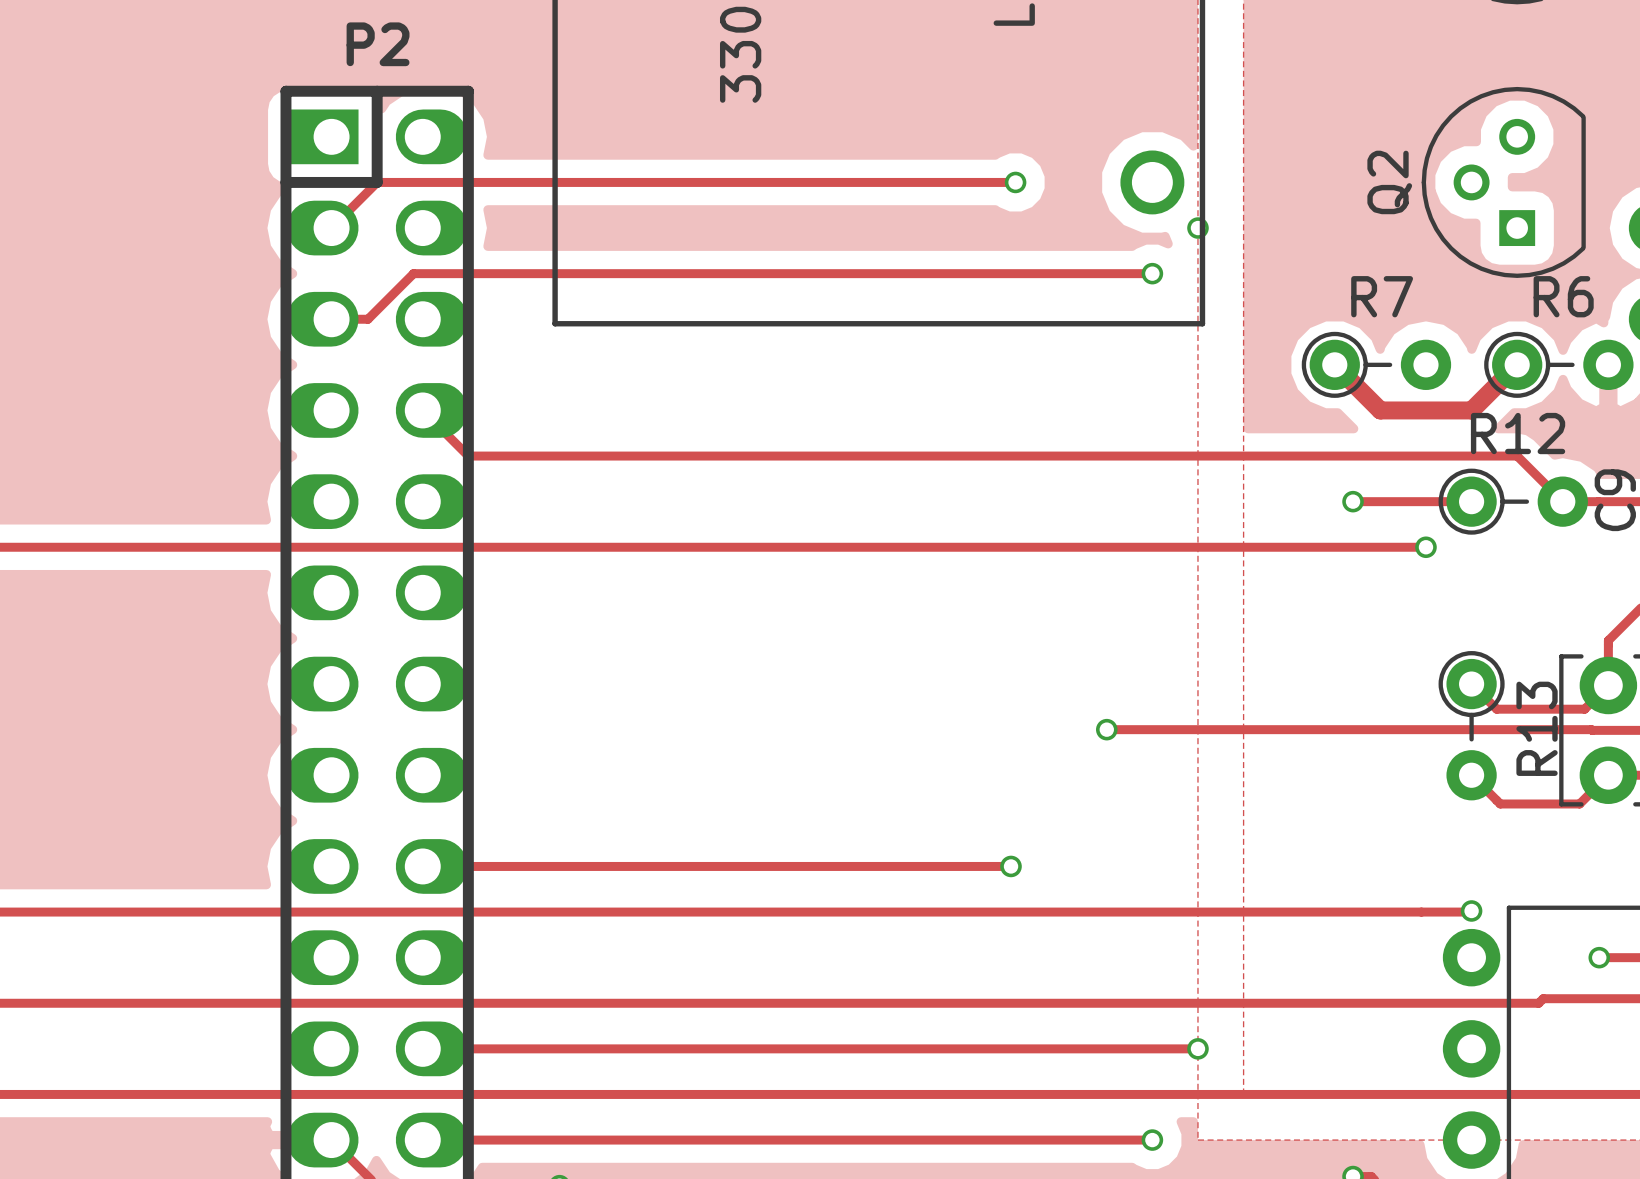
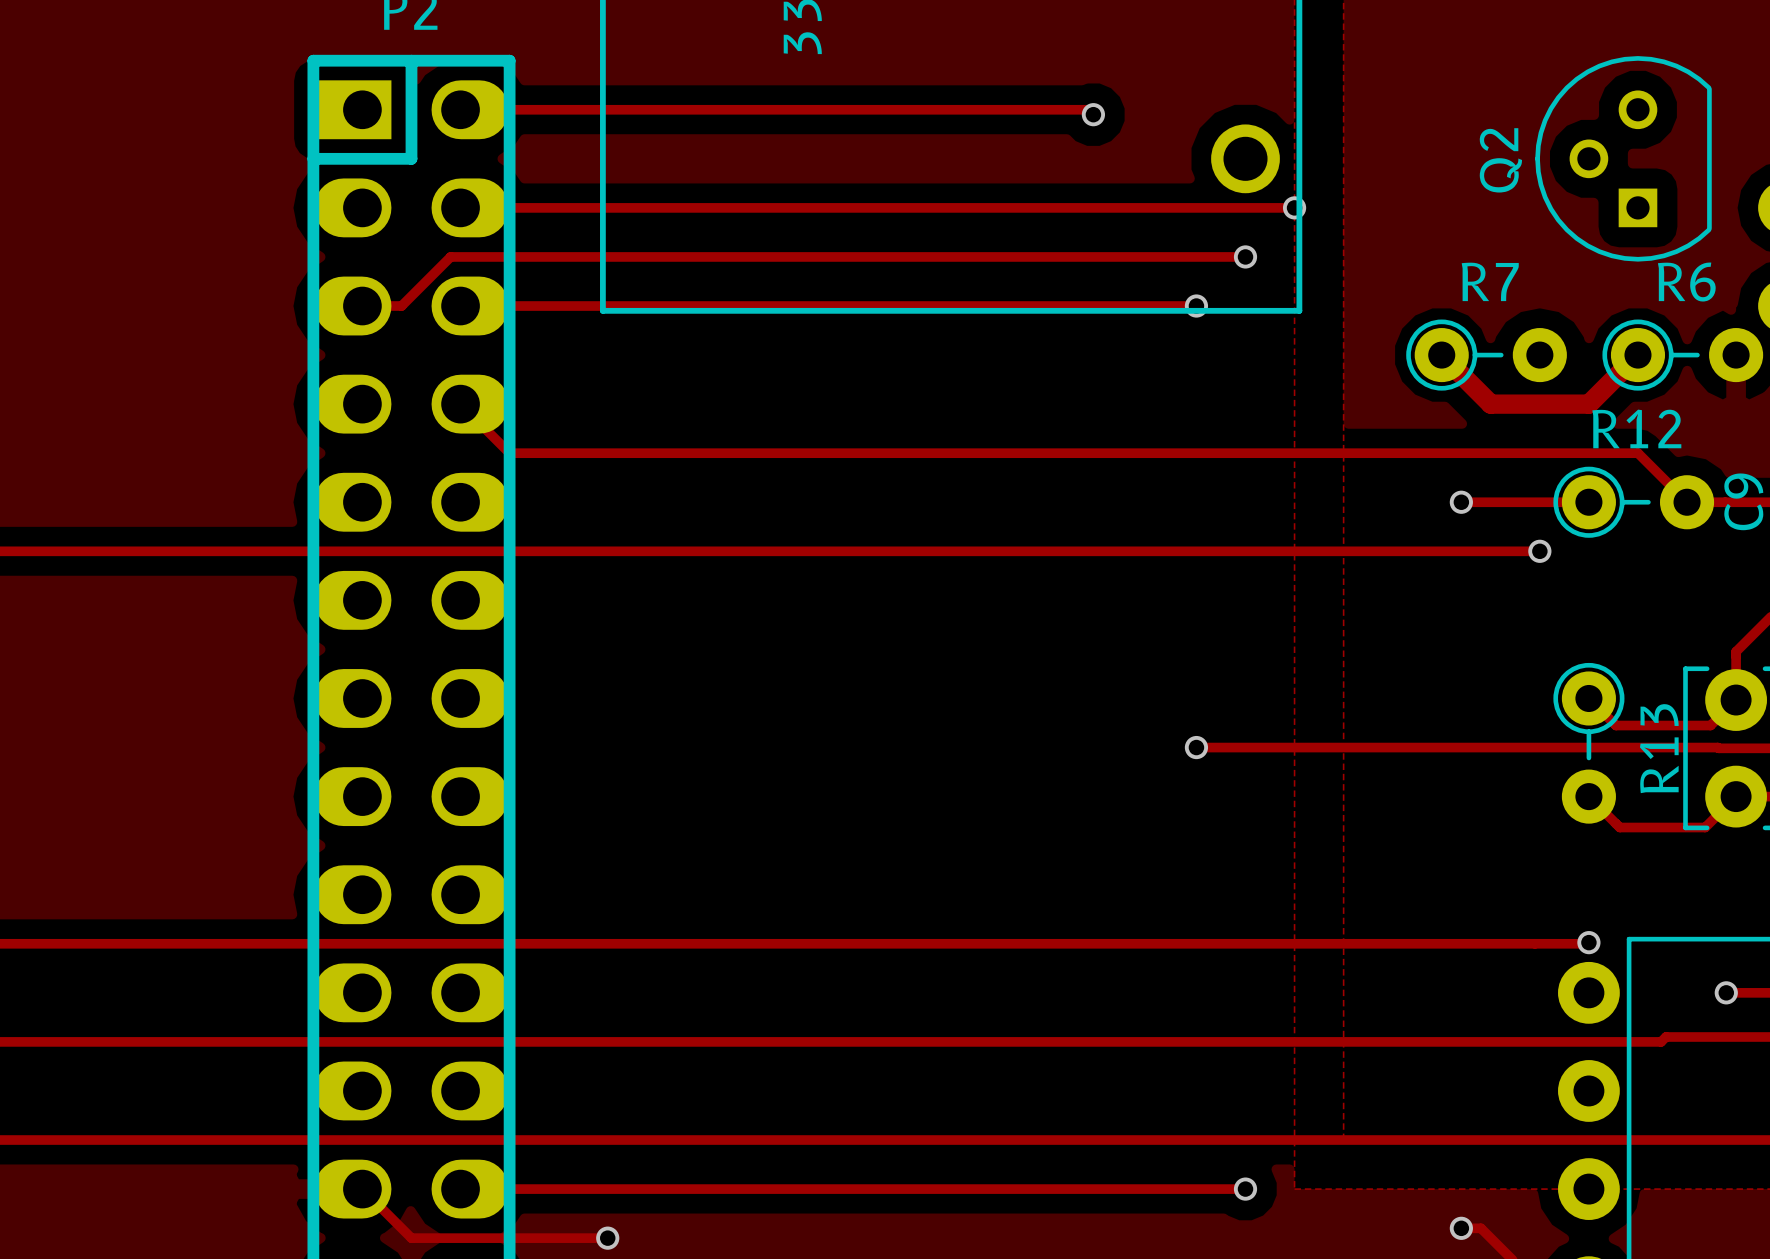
track: none -> (460, 109) (1088, 109) (1093, 114)
track: (1015, 182) (377, 182) (331, 228) -> none
via position: (1015, 182) -> (1093, 114)
track: none -> (460, 306) (1196, 306)
via: none -> (1196, 306)
track: (422, 866) (1011, 866) -> none
via: (1011, 866) -> none
track: (422, 1048) (1197, 1048) -> (460, 207) (1294, 207)
via: (1197, 1048) -> none

